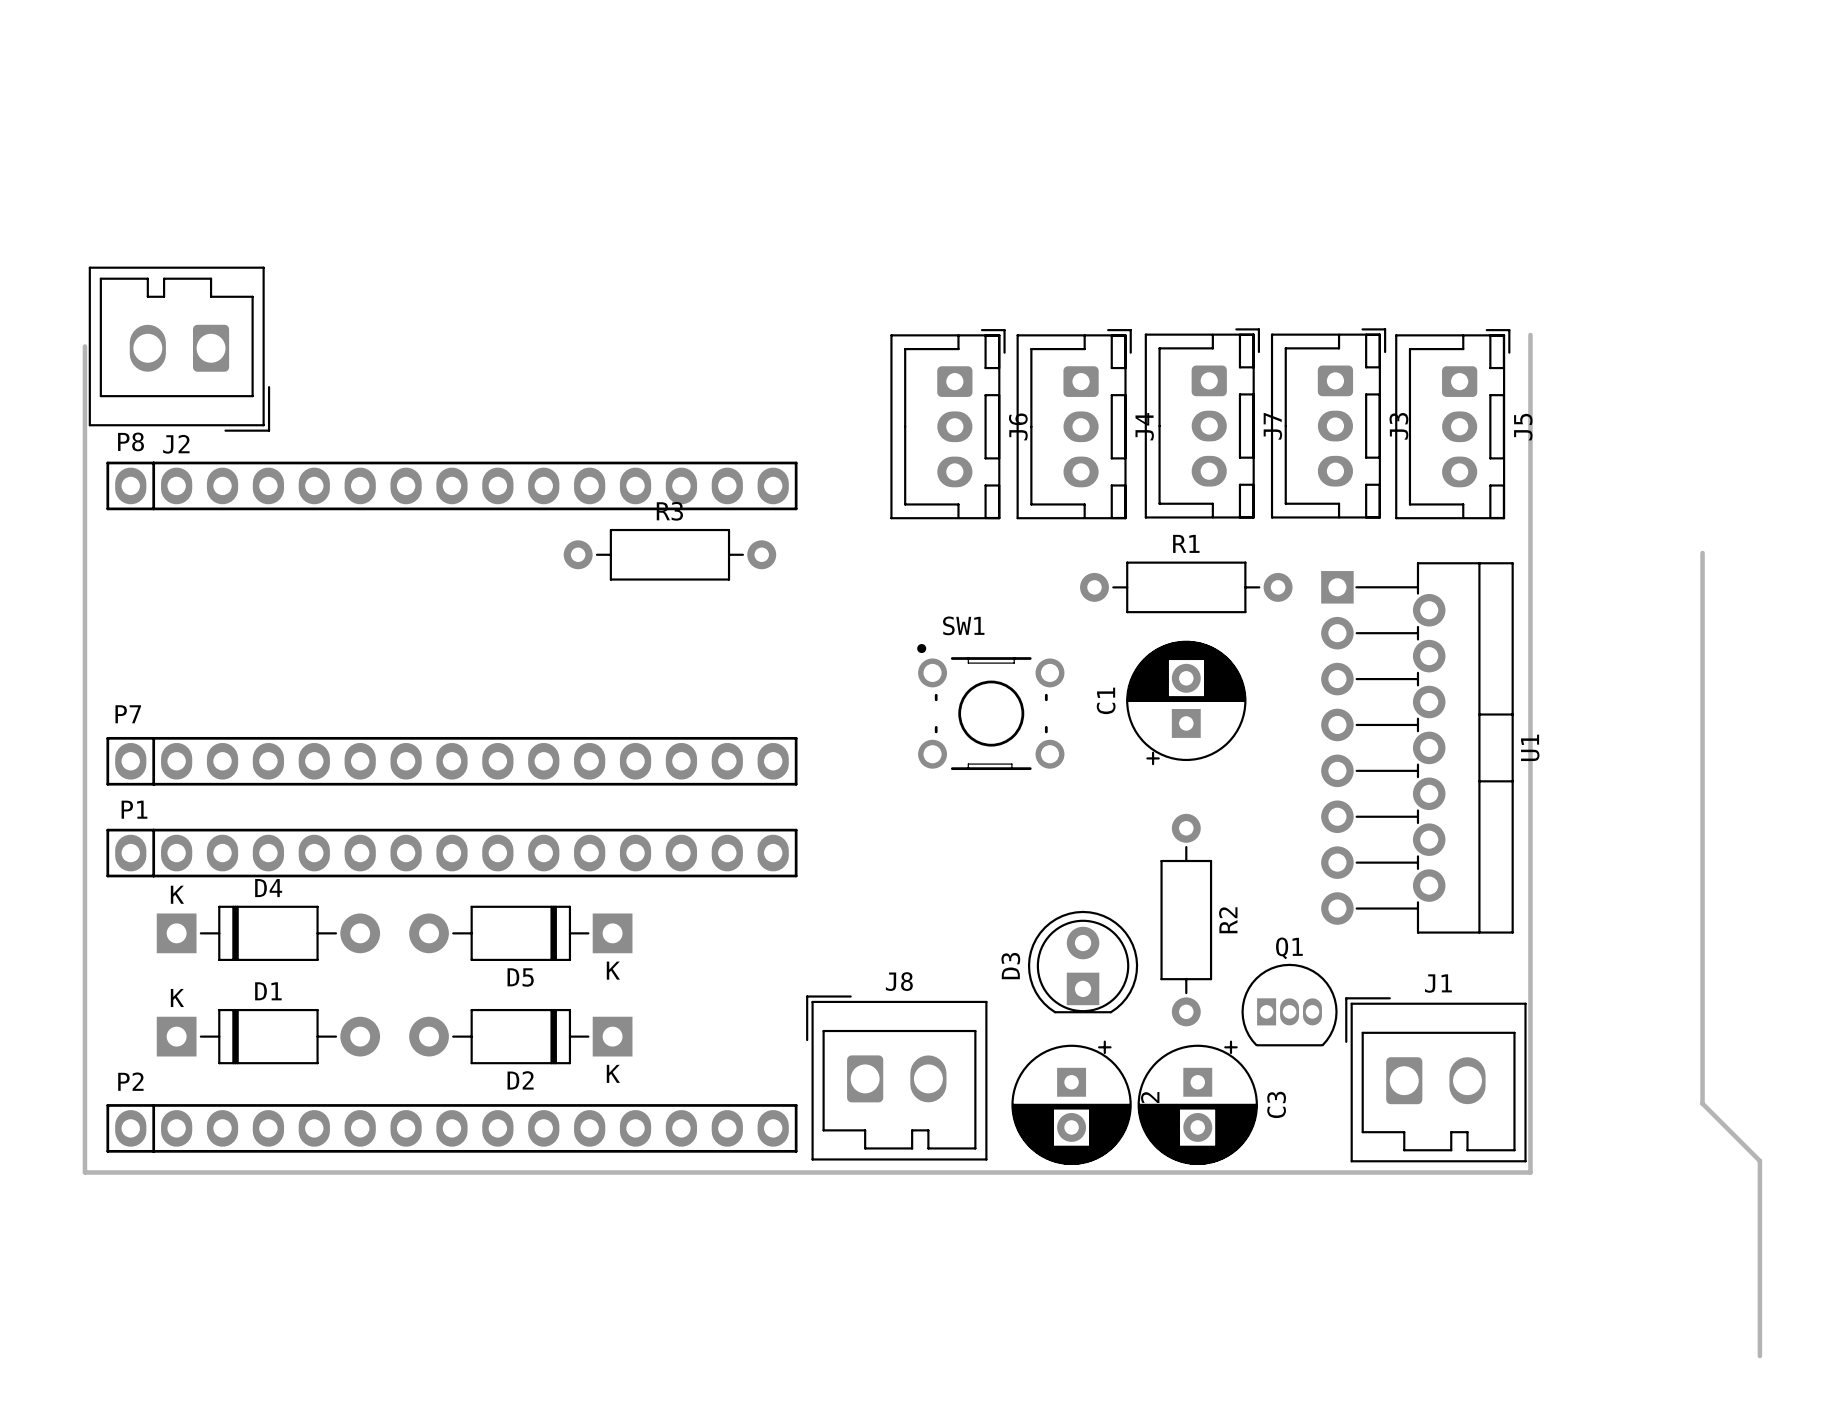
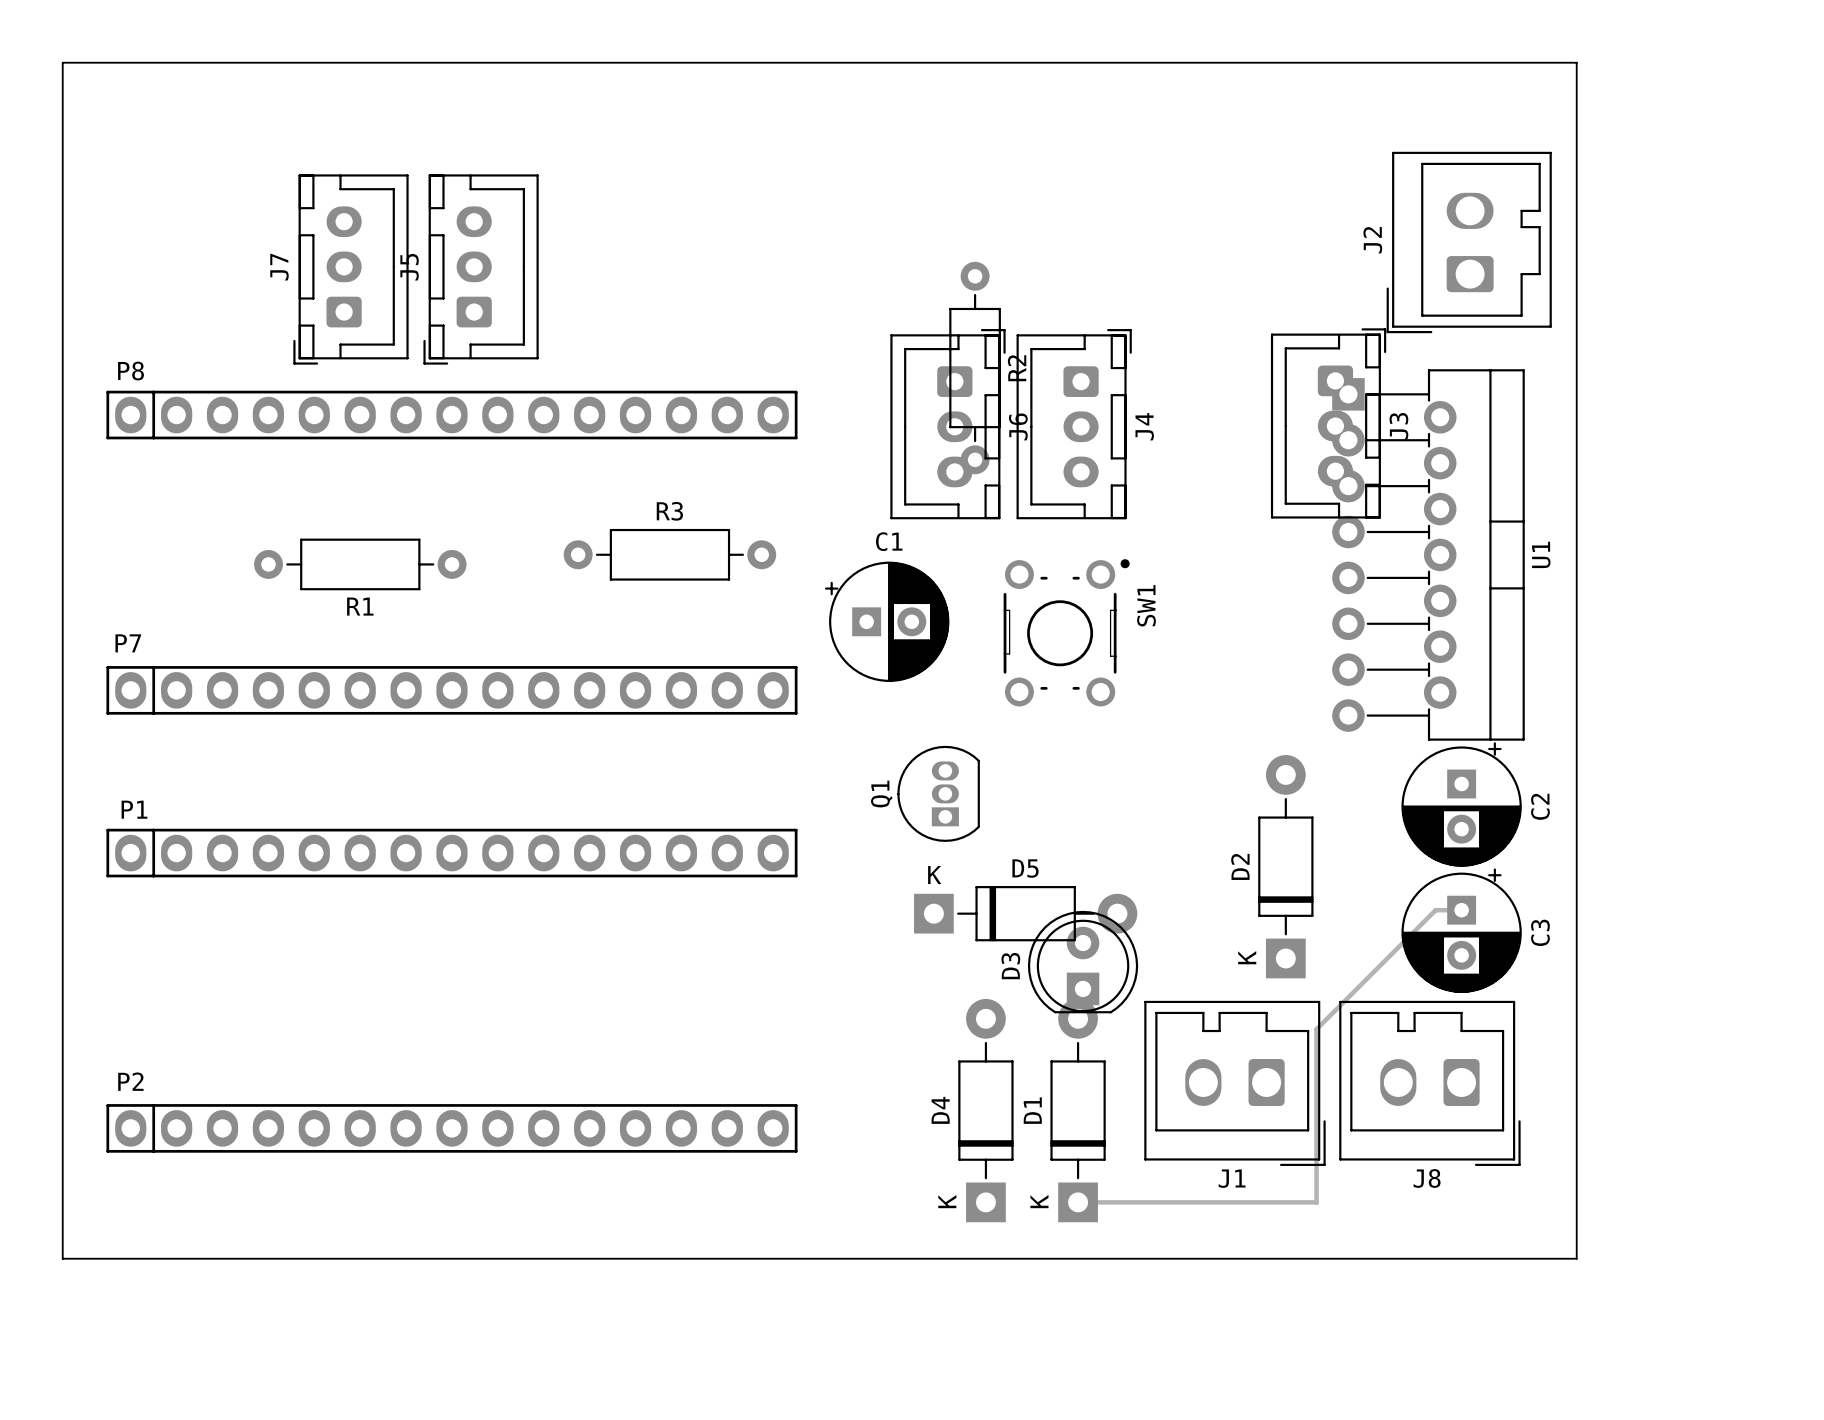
board edge: none -> (62, 62) (1576, 62) (1576, 1258) (62, 1258) (62, 62)
track: (1530, 334) (1530, 1172) (84, 1172) (84, 346) -> none
J2 rotation: 0° (179, 349) -> 90° clockwise (1469, 242)
J2 position: (179, 349) -> (1469, 242)
J7 rotation: 0° (1202, 423) -> 180° (350, 269)
J7 position: (1202, 423) -> (350, 269)
J5 rotation: 0° (1452, 424) -> 180° (481, 269)
J5 position: (1452, 424) -> (481, 269)
P8 position: (451, 485) -> (451, 415)
R1 name position: R1 (1186, 543) -> R1 (360, 606)
track: (1702, 552) (1702, 1103) (1759, 1161) (1759, 1356) -> none
R1 position: (1186, 587) -> (360, 564)
C1 rotation: 0° (1186, 702) -> 90° clockwise (887, 621)
C1 position: (1186, 702) -> (887, 621)
SW1 rotation: 0° (990, 707) -> 90° clockwise (1066, 632)
SW1 position: (990, 707) -> (1066, 632)
U1 position: (1417, 747) -> (1428, 554)
P7 position: (451, 761) -> (451, 690)
track: none -> (1461, 910) (1435, 910) (1316, 1029) (1316, 1202) (1078, 1202)
R2 position: (1186, 920) -> (975, 368)
D4 rotation: 0° (268, 933) -> 90° counterclockwise (985, 1110)
D4 position: (268, 933) -> (985, 1110)
D5 rotation: 0° (520, 933) -> 180° (1025, 913)
D5 position: (520, 933) -> (1025, 913)
Q1 rotation: 0° (1289, 1005) -> 90° counterclockwise (938, 793)
Q1 position: (1289, 1005) -> (938, 793)
D1 rotation: 0° (268, 1036) -> 90° counterclockwise (1078, 1110)
D1 position: (268, 1036) -> (1078, 1110)
D2 rotation: 0° (520, 1036) -> 90° clockwise (1285, 866)
D2 position: (520, 1036) -> (1285, 866)
J8 rotation: 0° (896, 1077) -> 180° (1429, 1083)
J8 position: (896, 1077) -> (1429, 1083)
J1 rotation: 0° (1435, 1079) -> 180° (1234, 1083)
J1 position: (1435, 1079) -> (1234, 1083)
C2 position: (1071, 1102) -> (1461, 804)
C3 position: (1197, 1102) -> (1461, 930)

